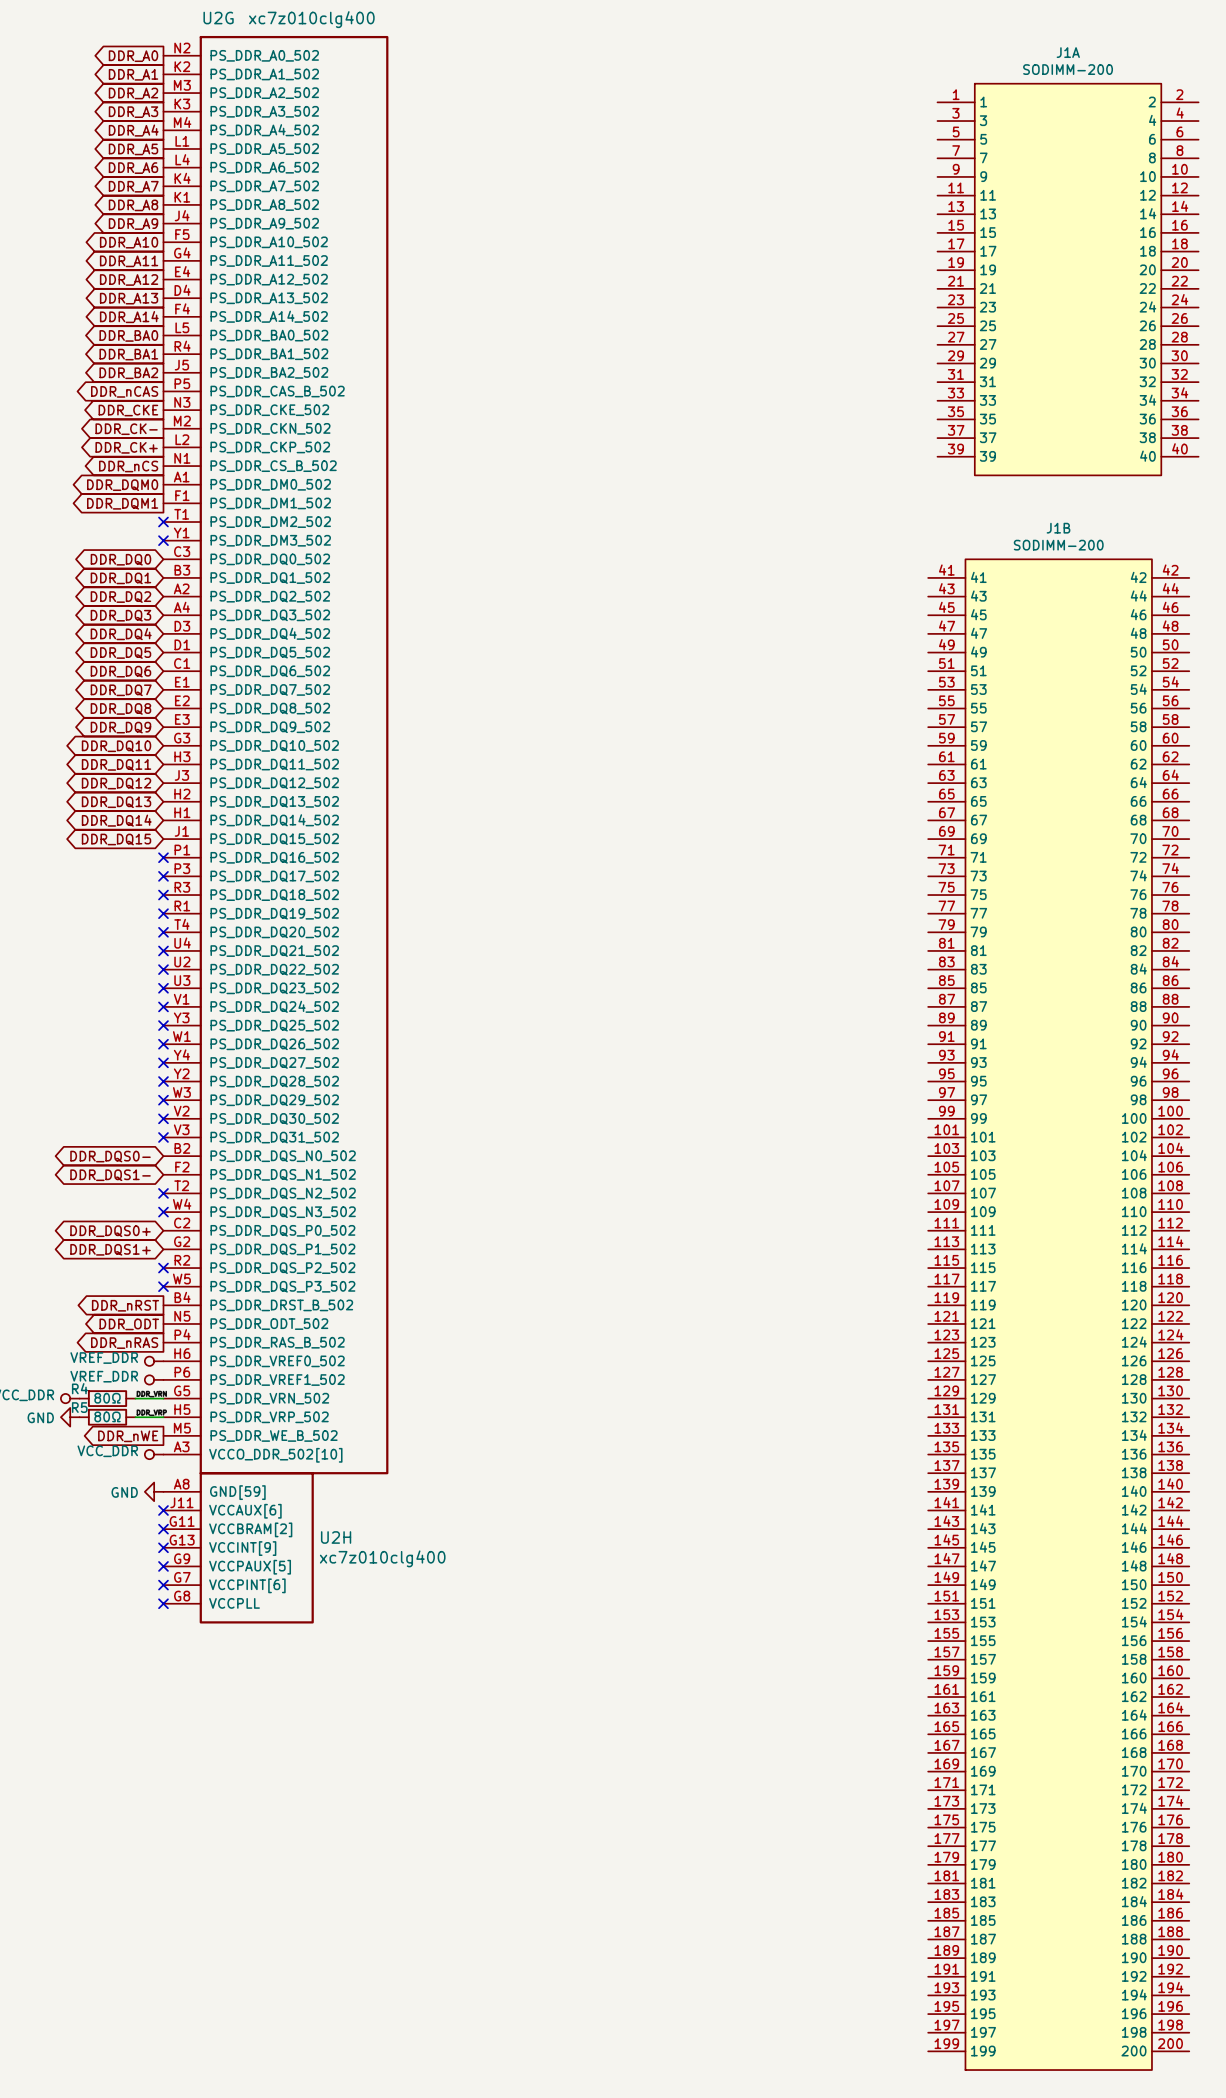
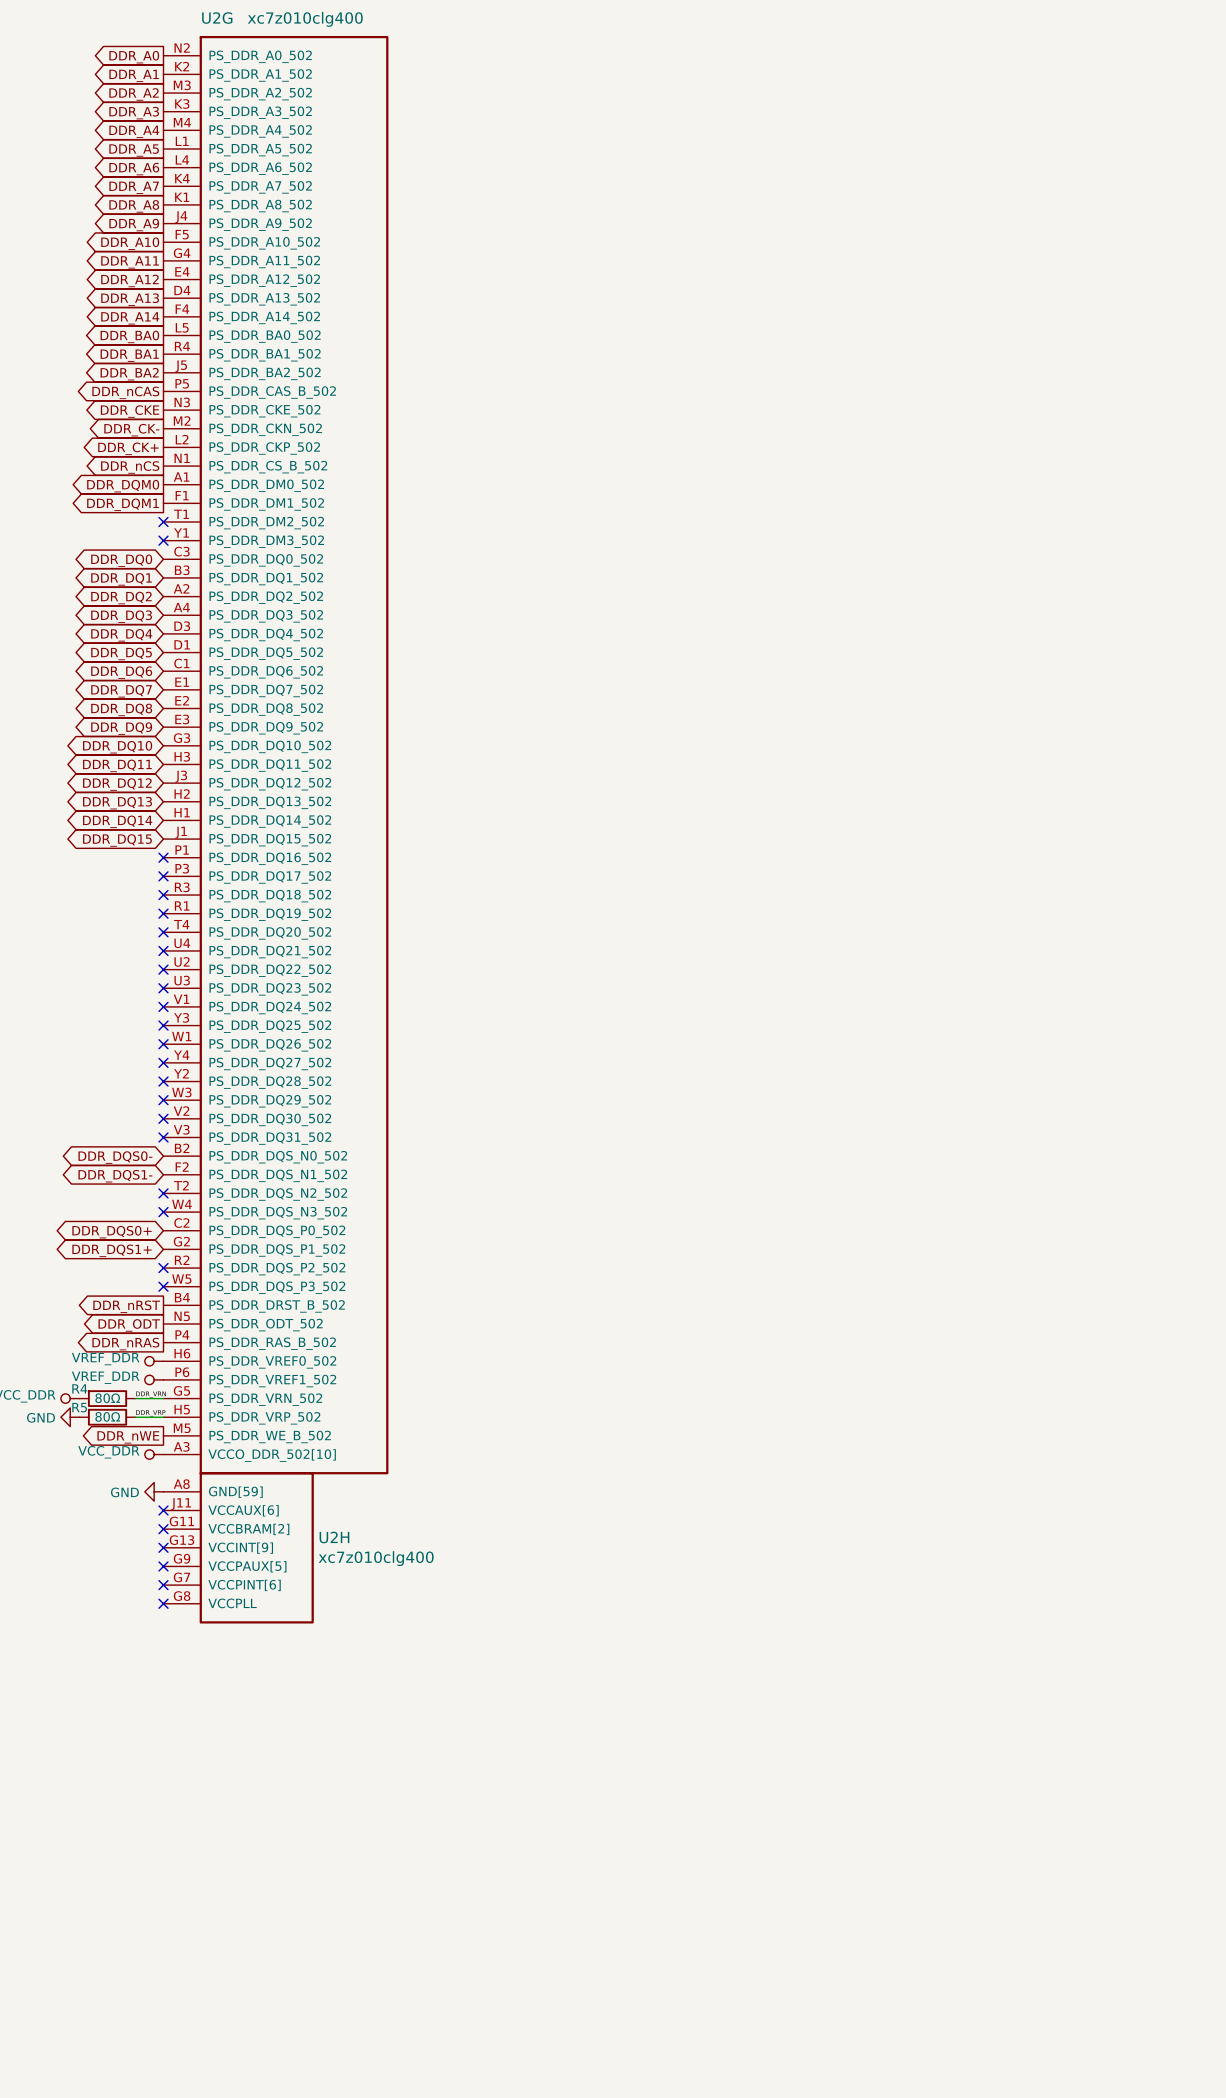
J1A: SODIMM-200 (1068, 279) -> none
J1B: SODIMM-200 (1058, 1314) -> none

